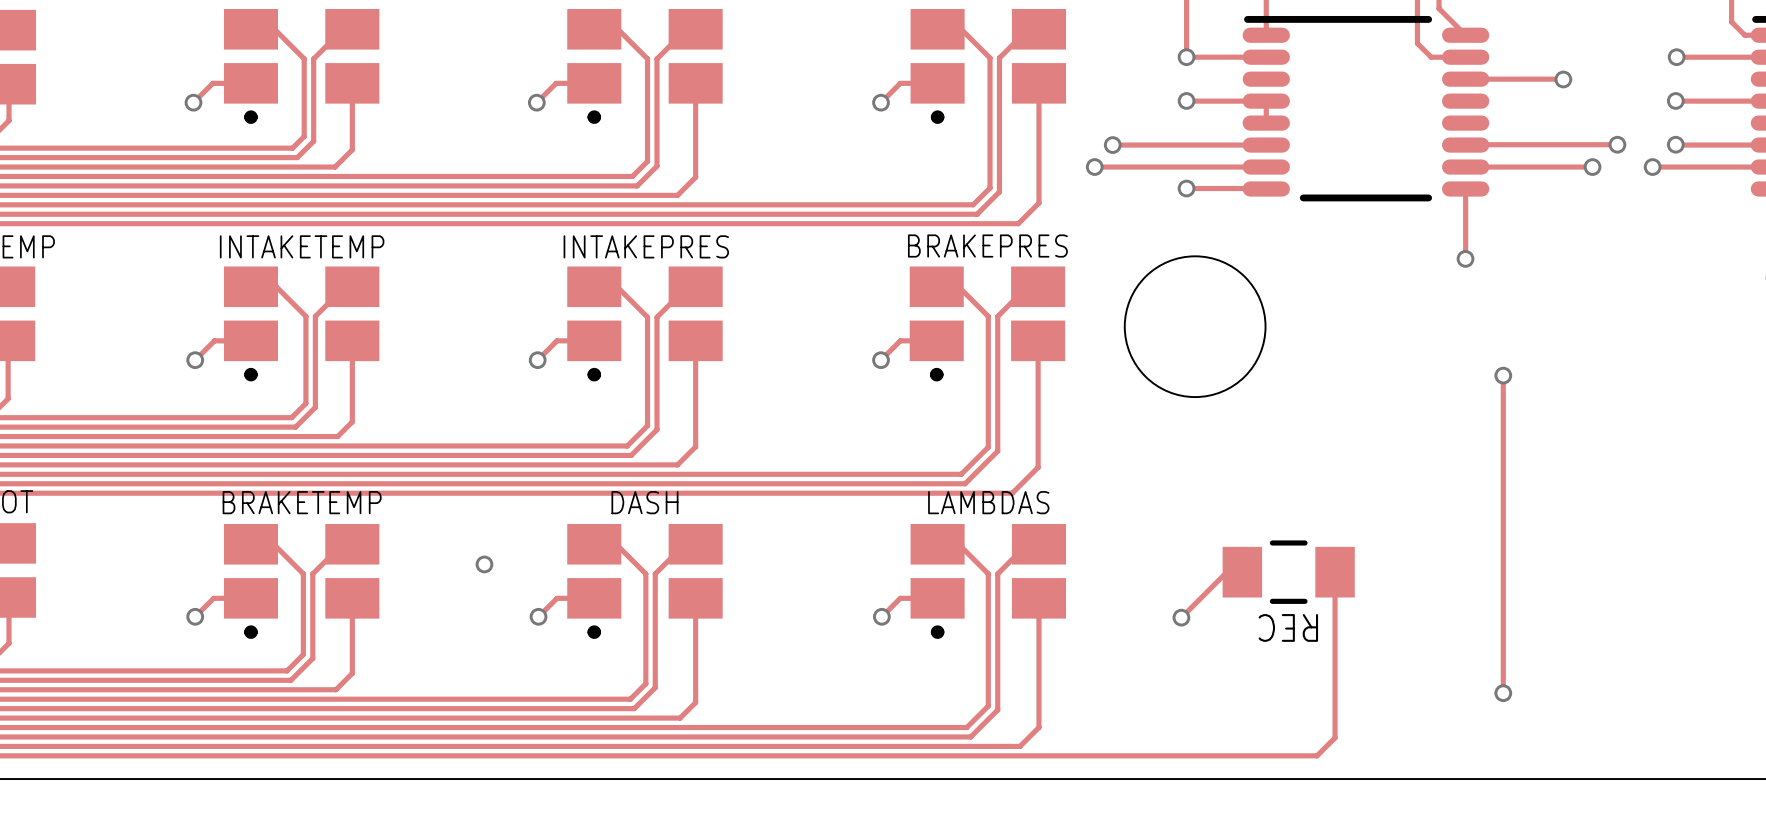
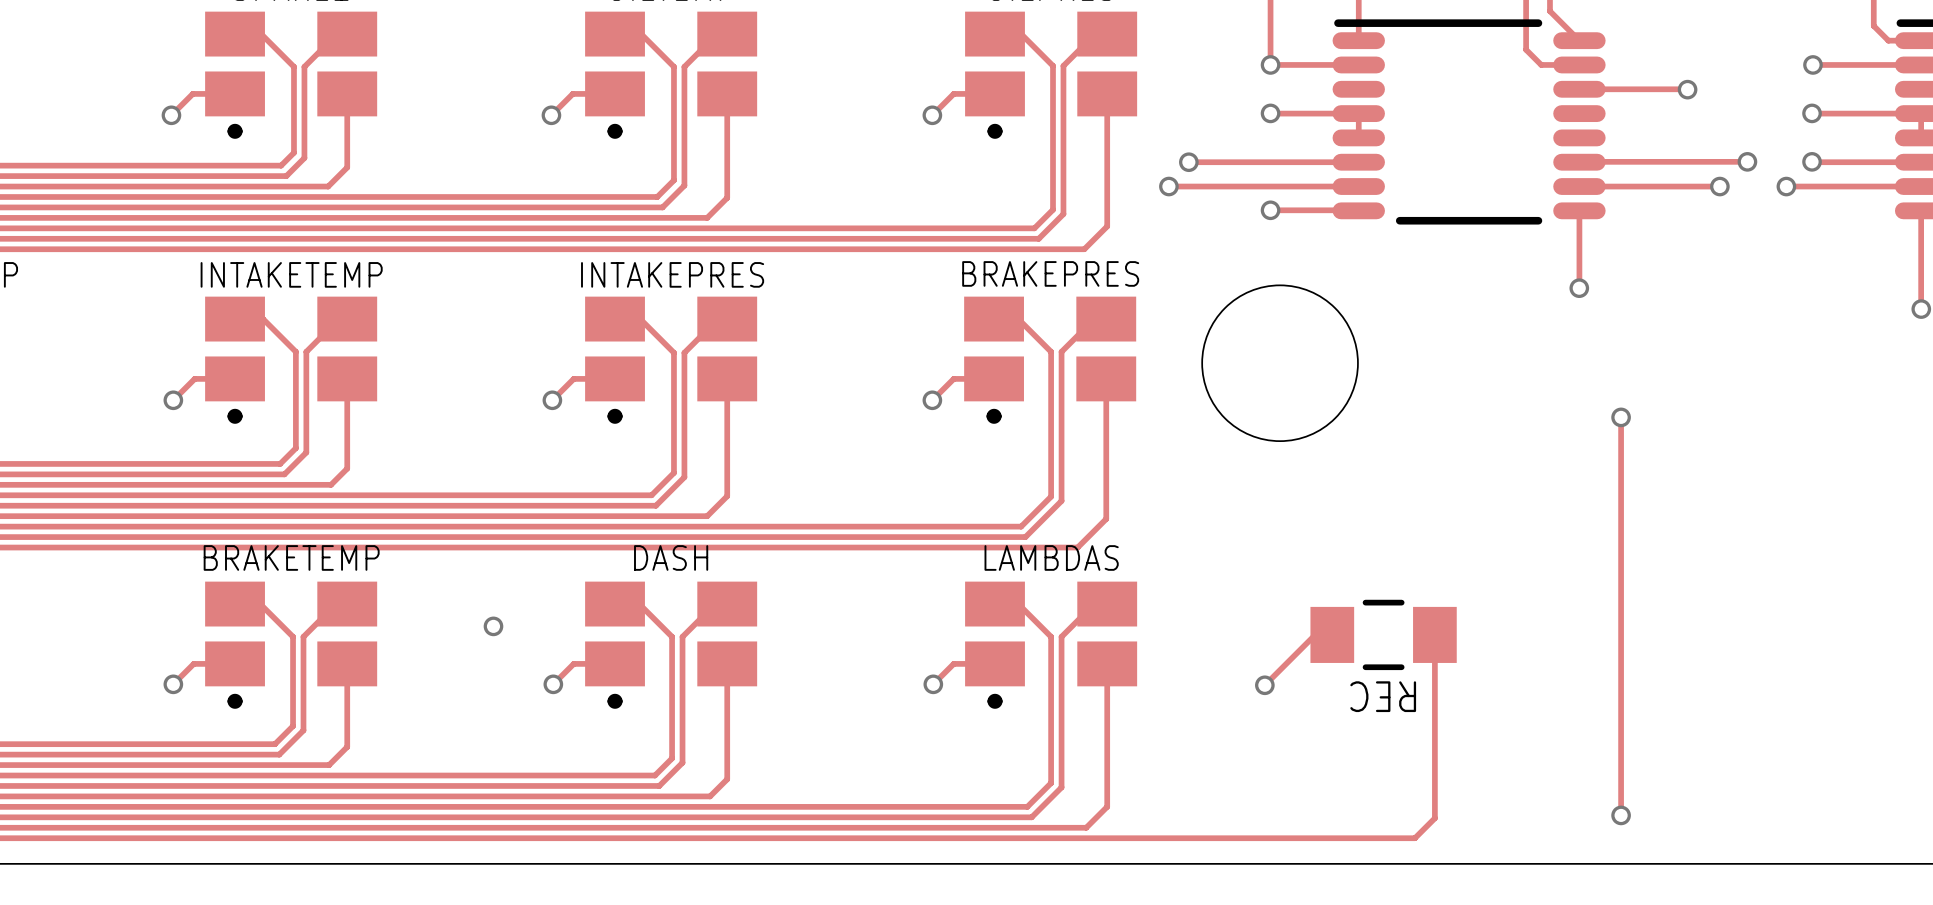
track: none -> (1621, 768) (1621, 815)
via position: (1503, 693) -> (1621, 815)

